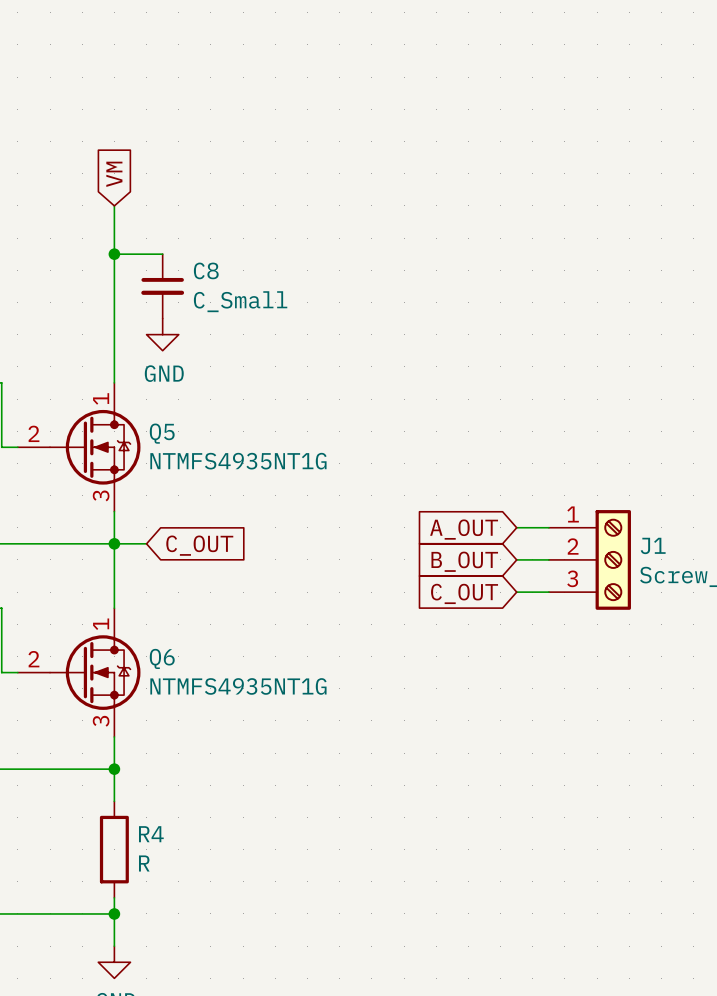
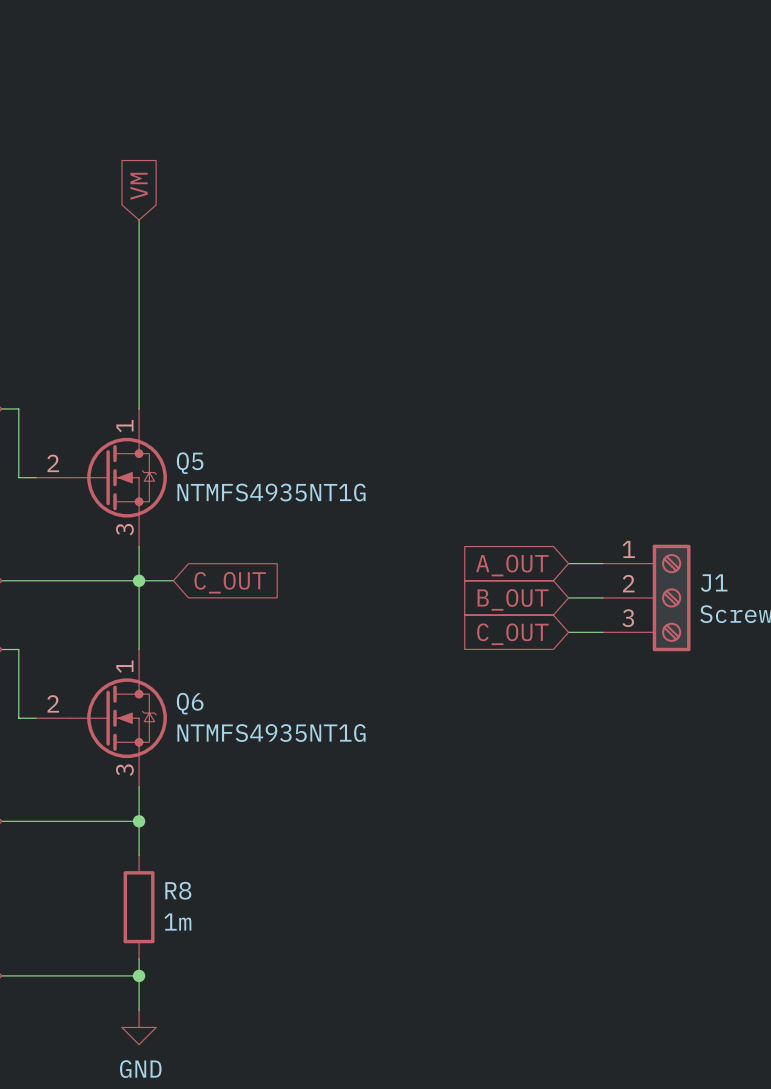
wire: (114, 254) (162, 254) -> none
junction: (114, 254) -> none
C8: C_Small (162, 286) -> none
power symbol: GND (162, 334) -> none
R4 name: R4 (151, 834) -> R8 (178, 890)
R4 value: R (144, 863) -> 1m (177, 922)

